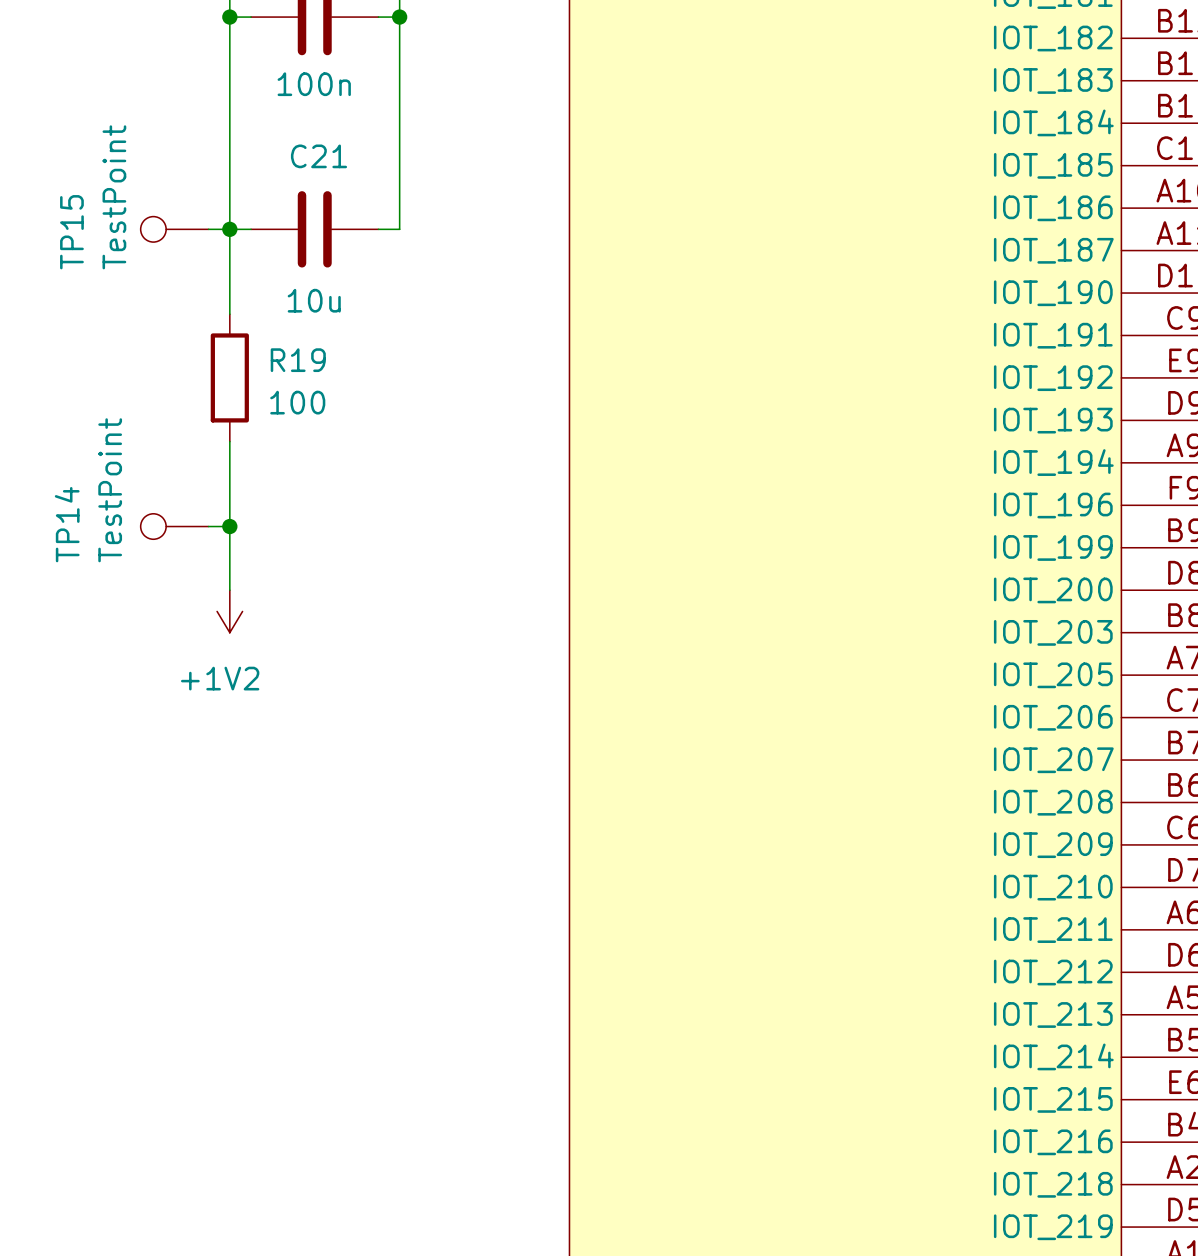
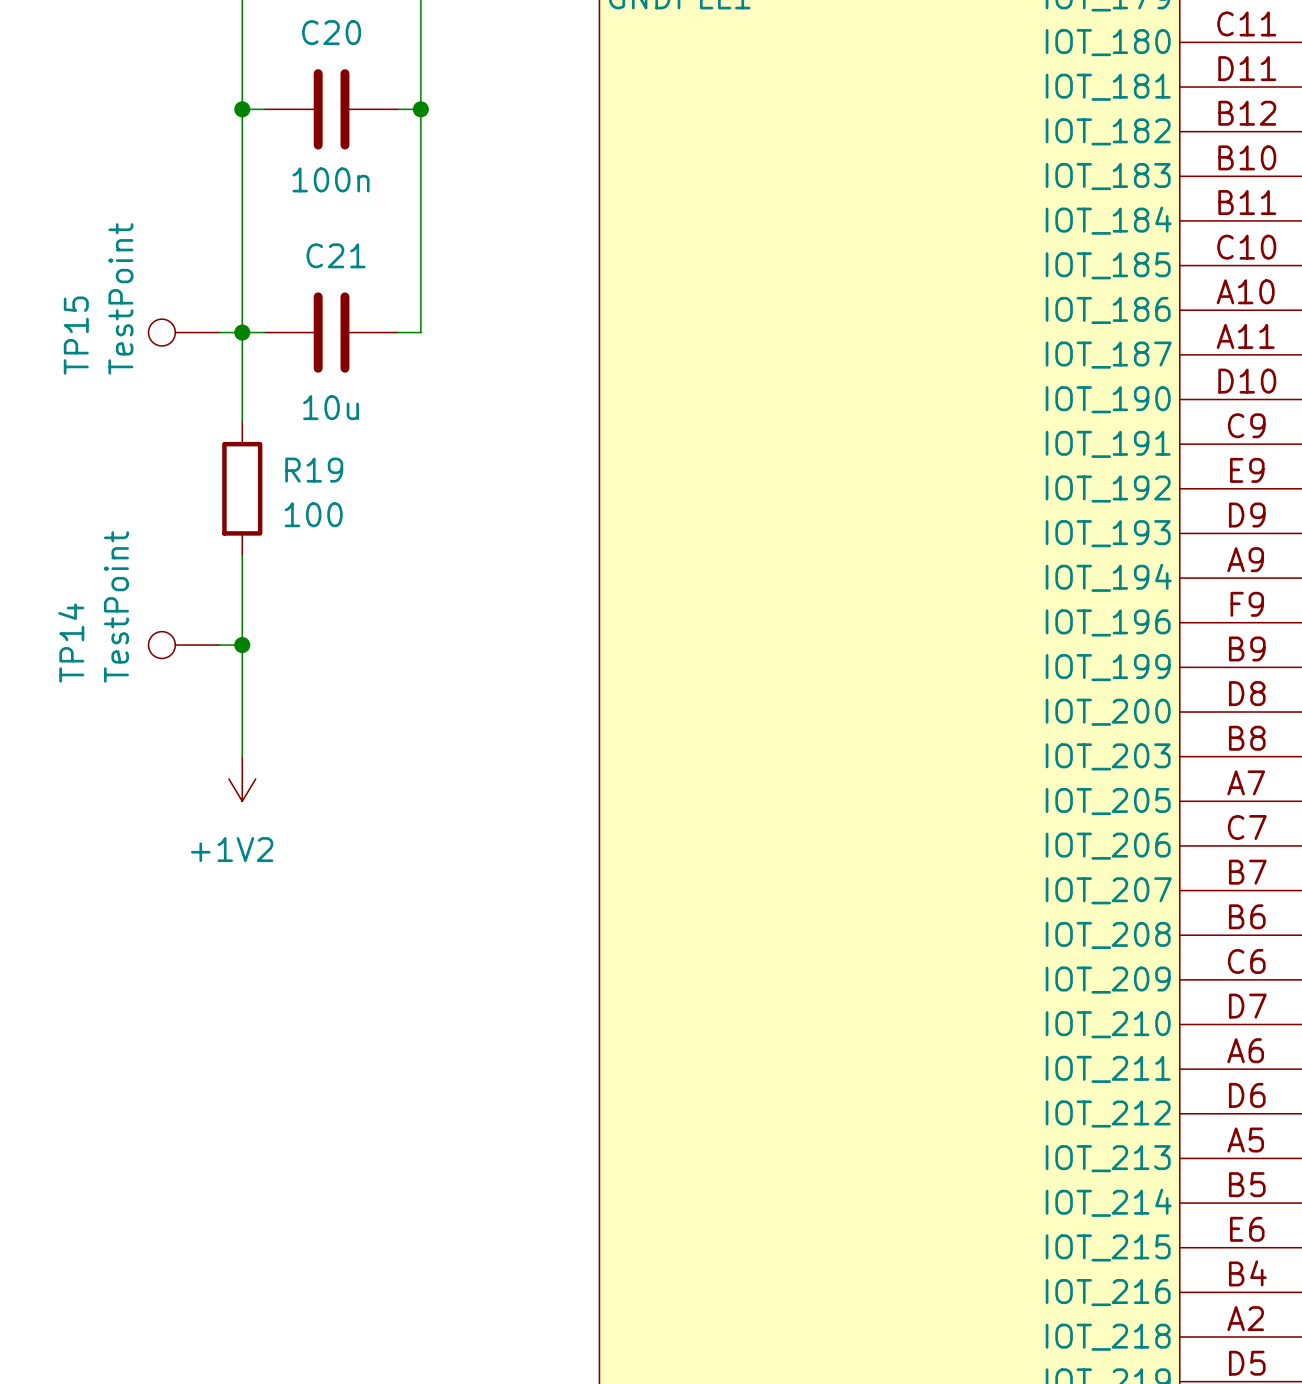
power symbol position: +1V2 (229, 611) -> +1V2 (242, 778)

